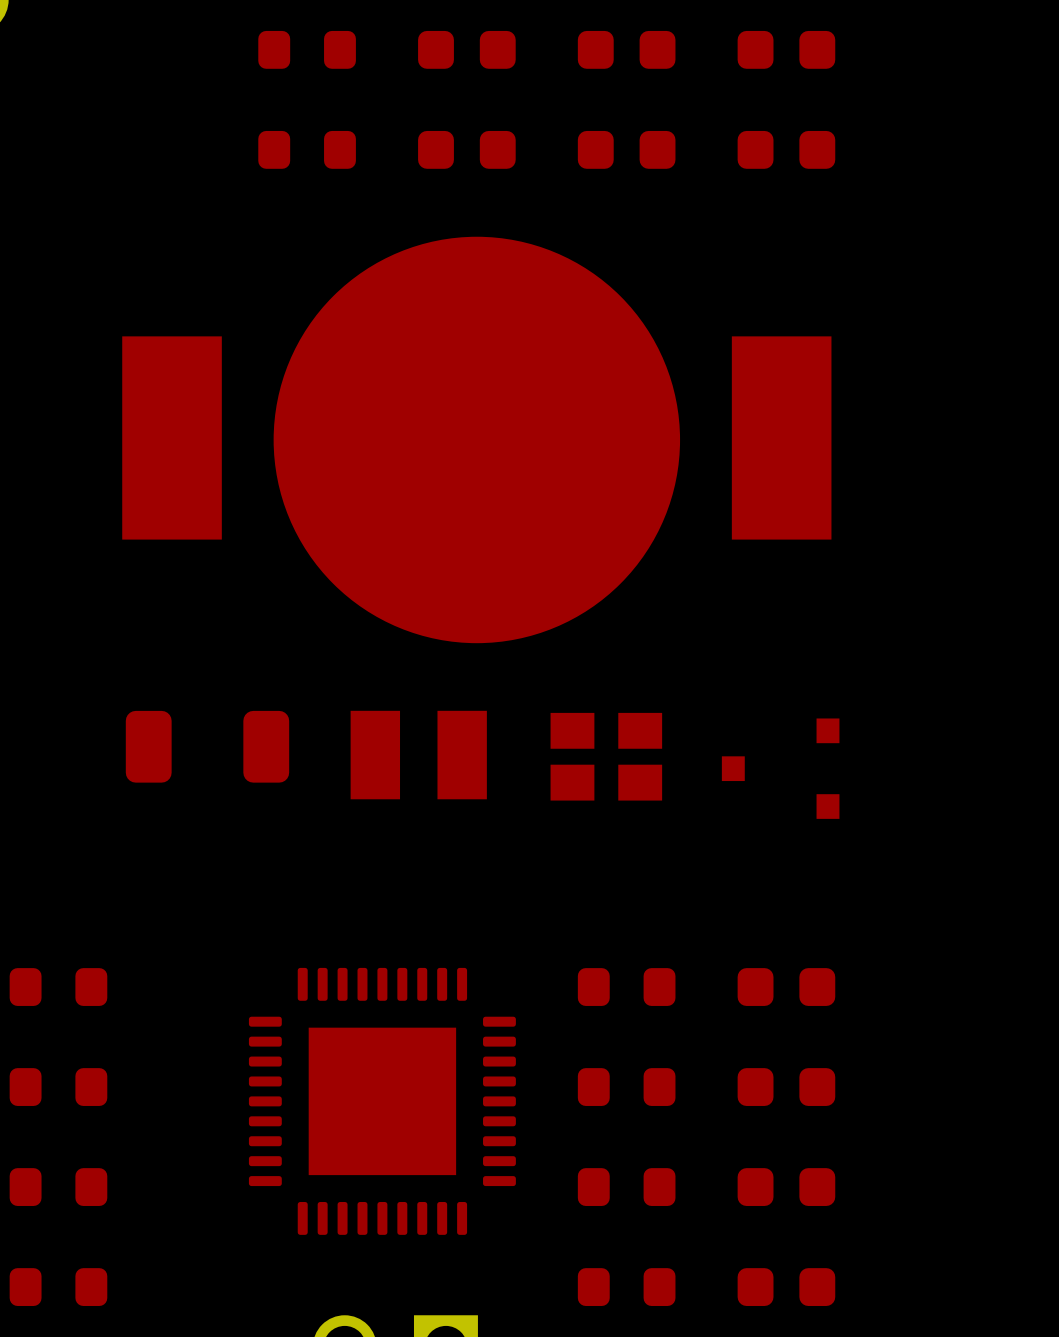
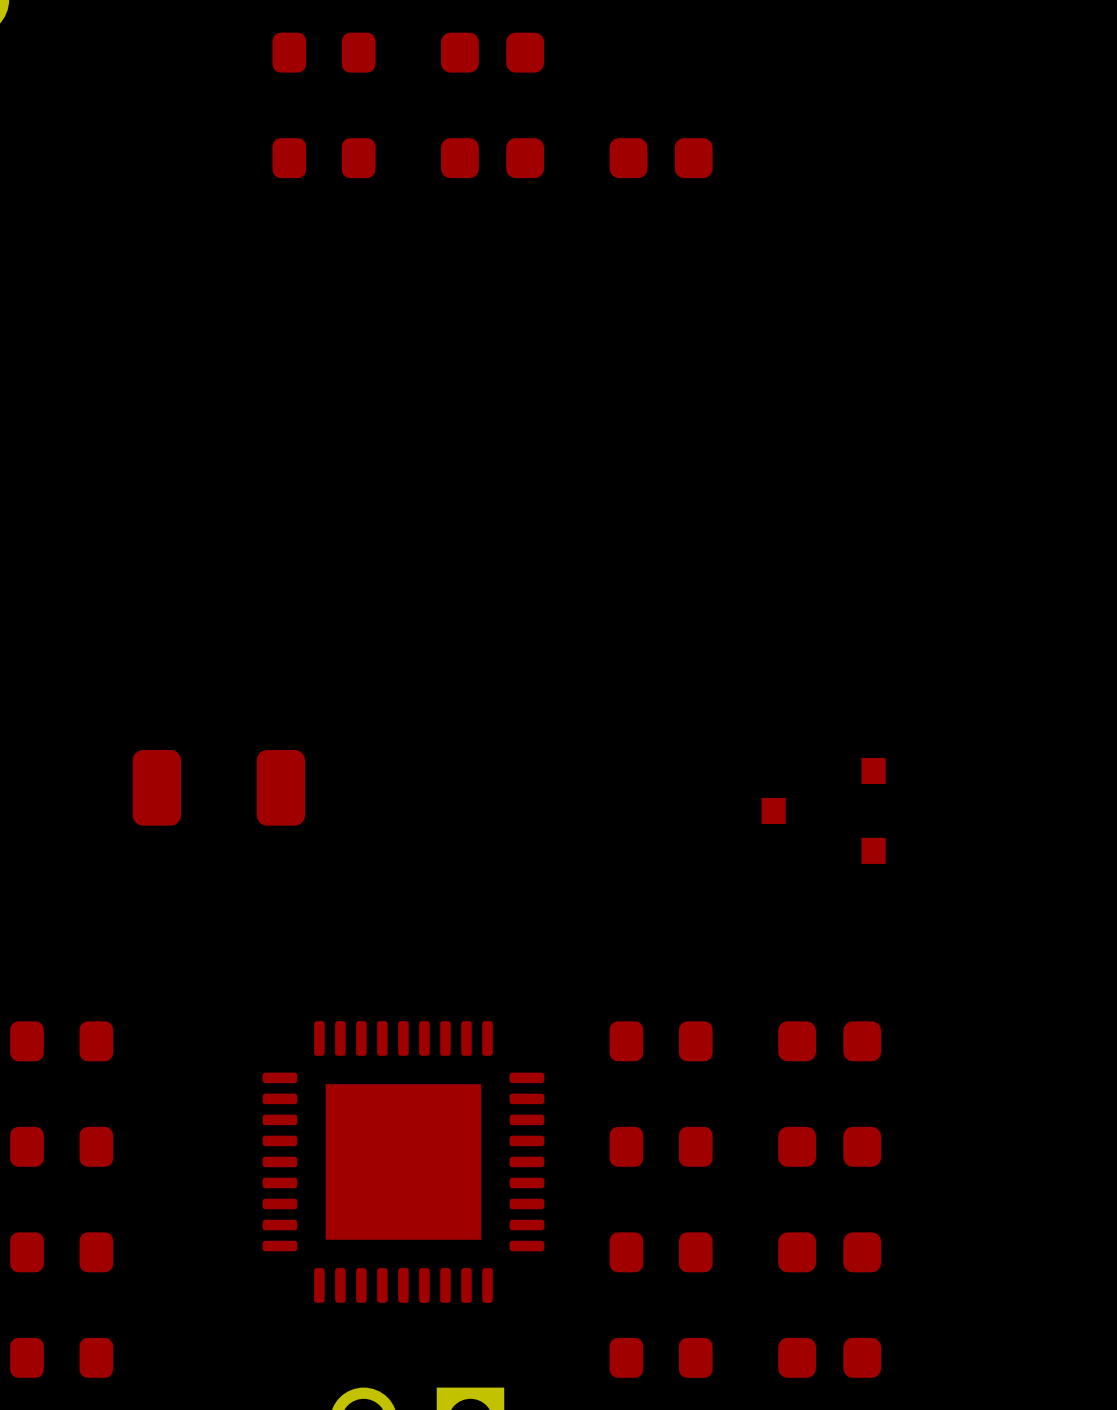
part: (626, 49) -> none
part: (786, 49) -> none
part: (786, 149) -> none
part: (476, 439) -> none
part: (418, 755) -> none
part: (606, 756) -> none

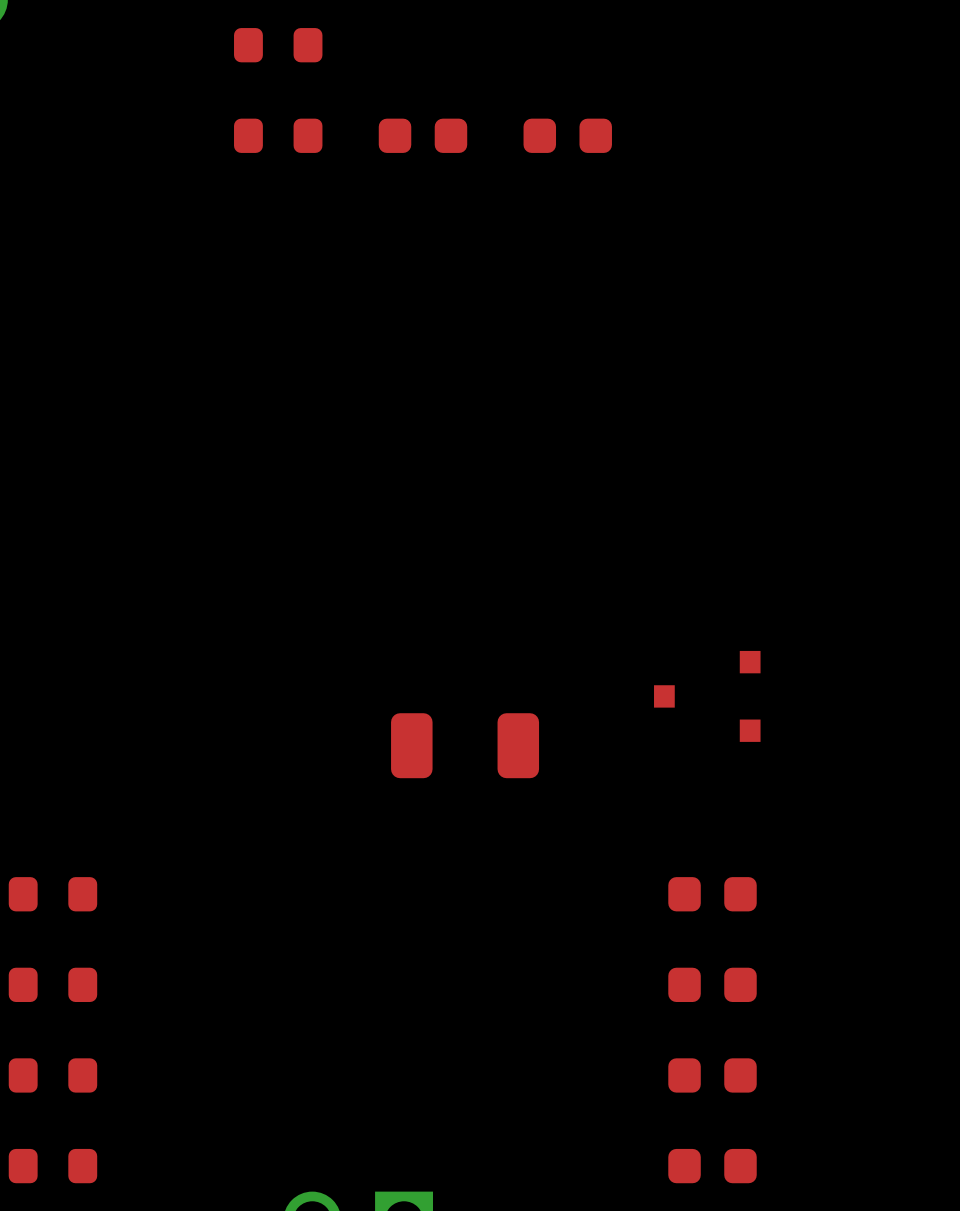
part: (492, 52) -> none
part position: (218, 787) -> (465, 745)
part: (661, 1041) -> none
part: (661, 1146) -> none
part: (403, 1161) -> none
part: (661, 1252) -> none
part: (661, 1357) -> none

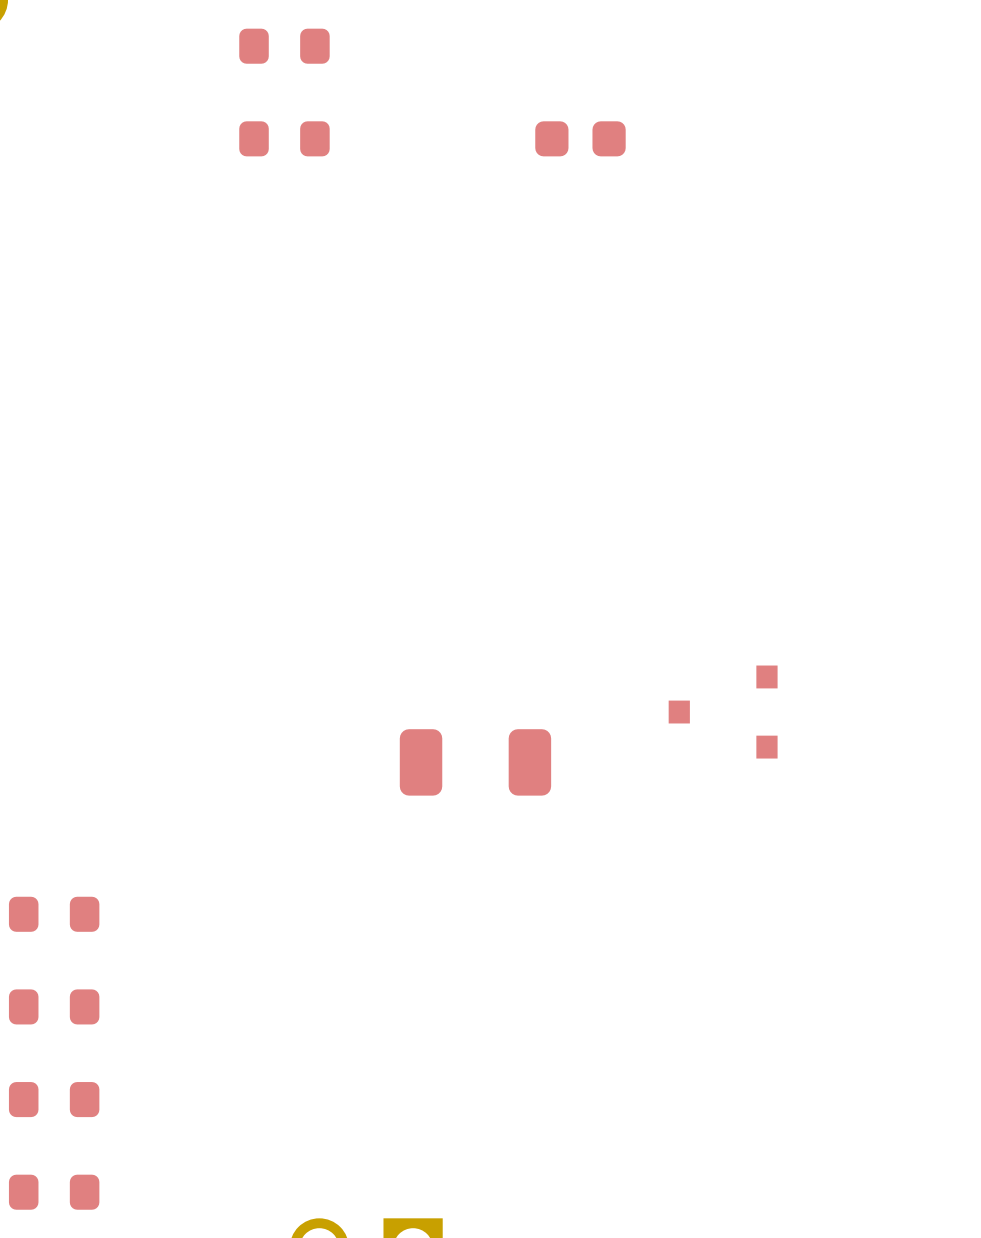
part: (422, 135) -> none
part: (712, 894) -> none
part: (712, 984) -> none
part: (712, 1075) -> none
part: (712, 1166) -> none

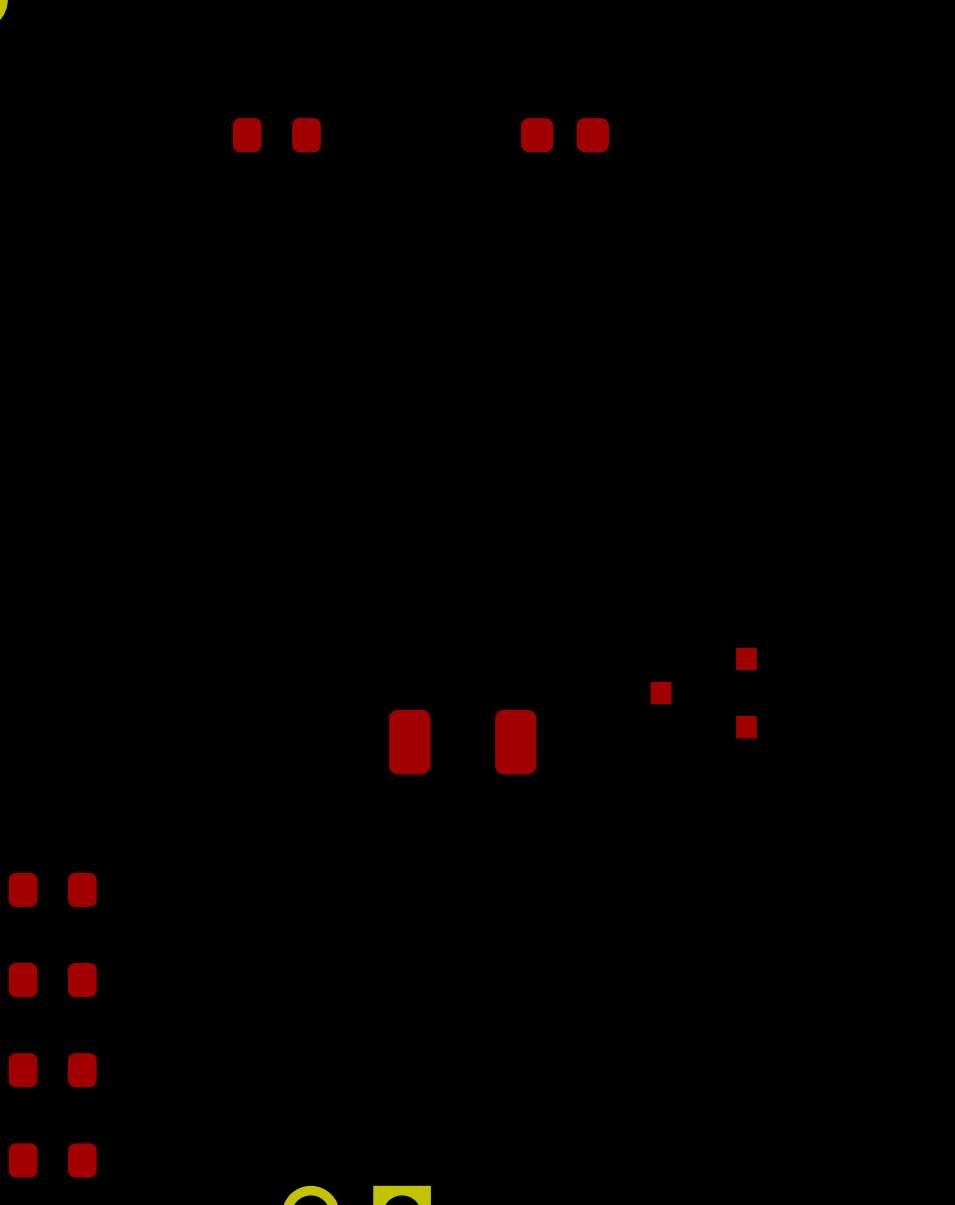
part: (284, 46) -> none

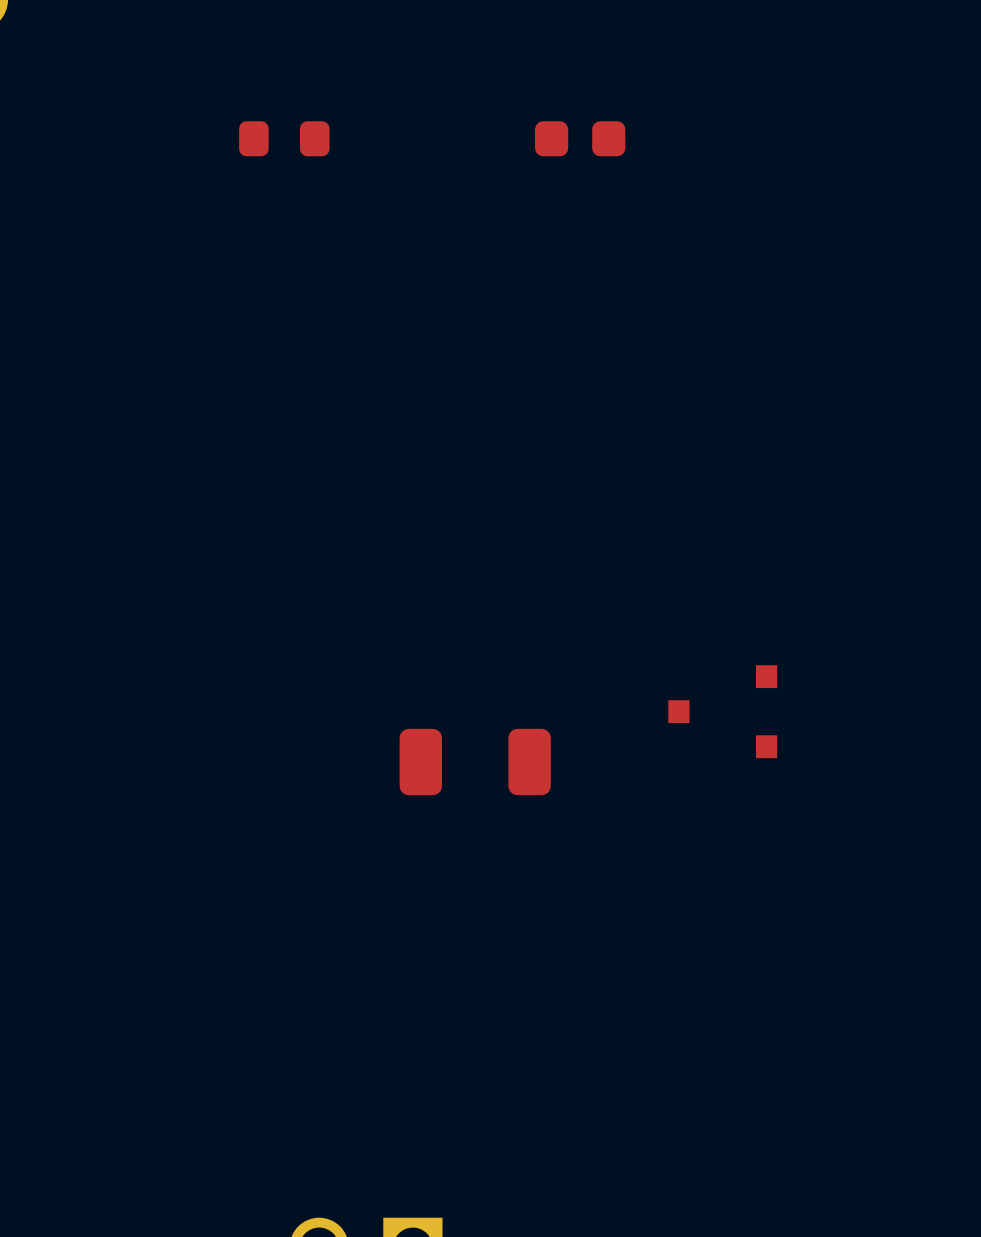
part: (52, 889) -> none
part: (52, 980) -> none
part: (52, 1070) -> none
part: (52, 1160) -> none

